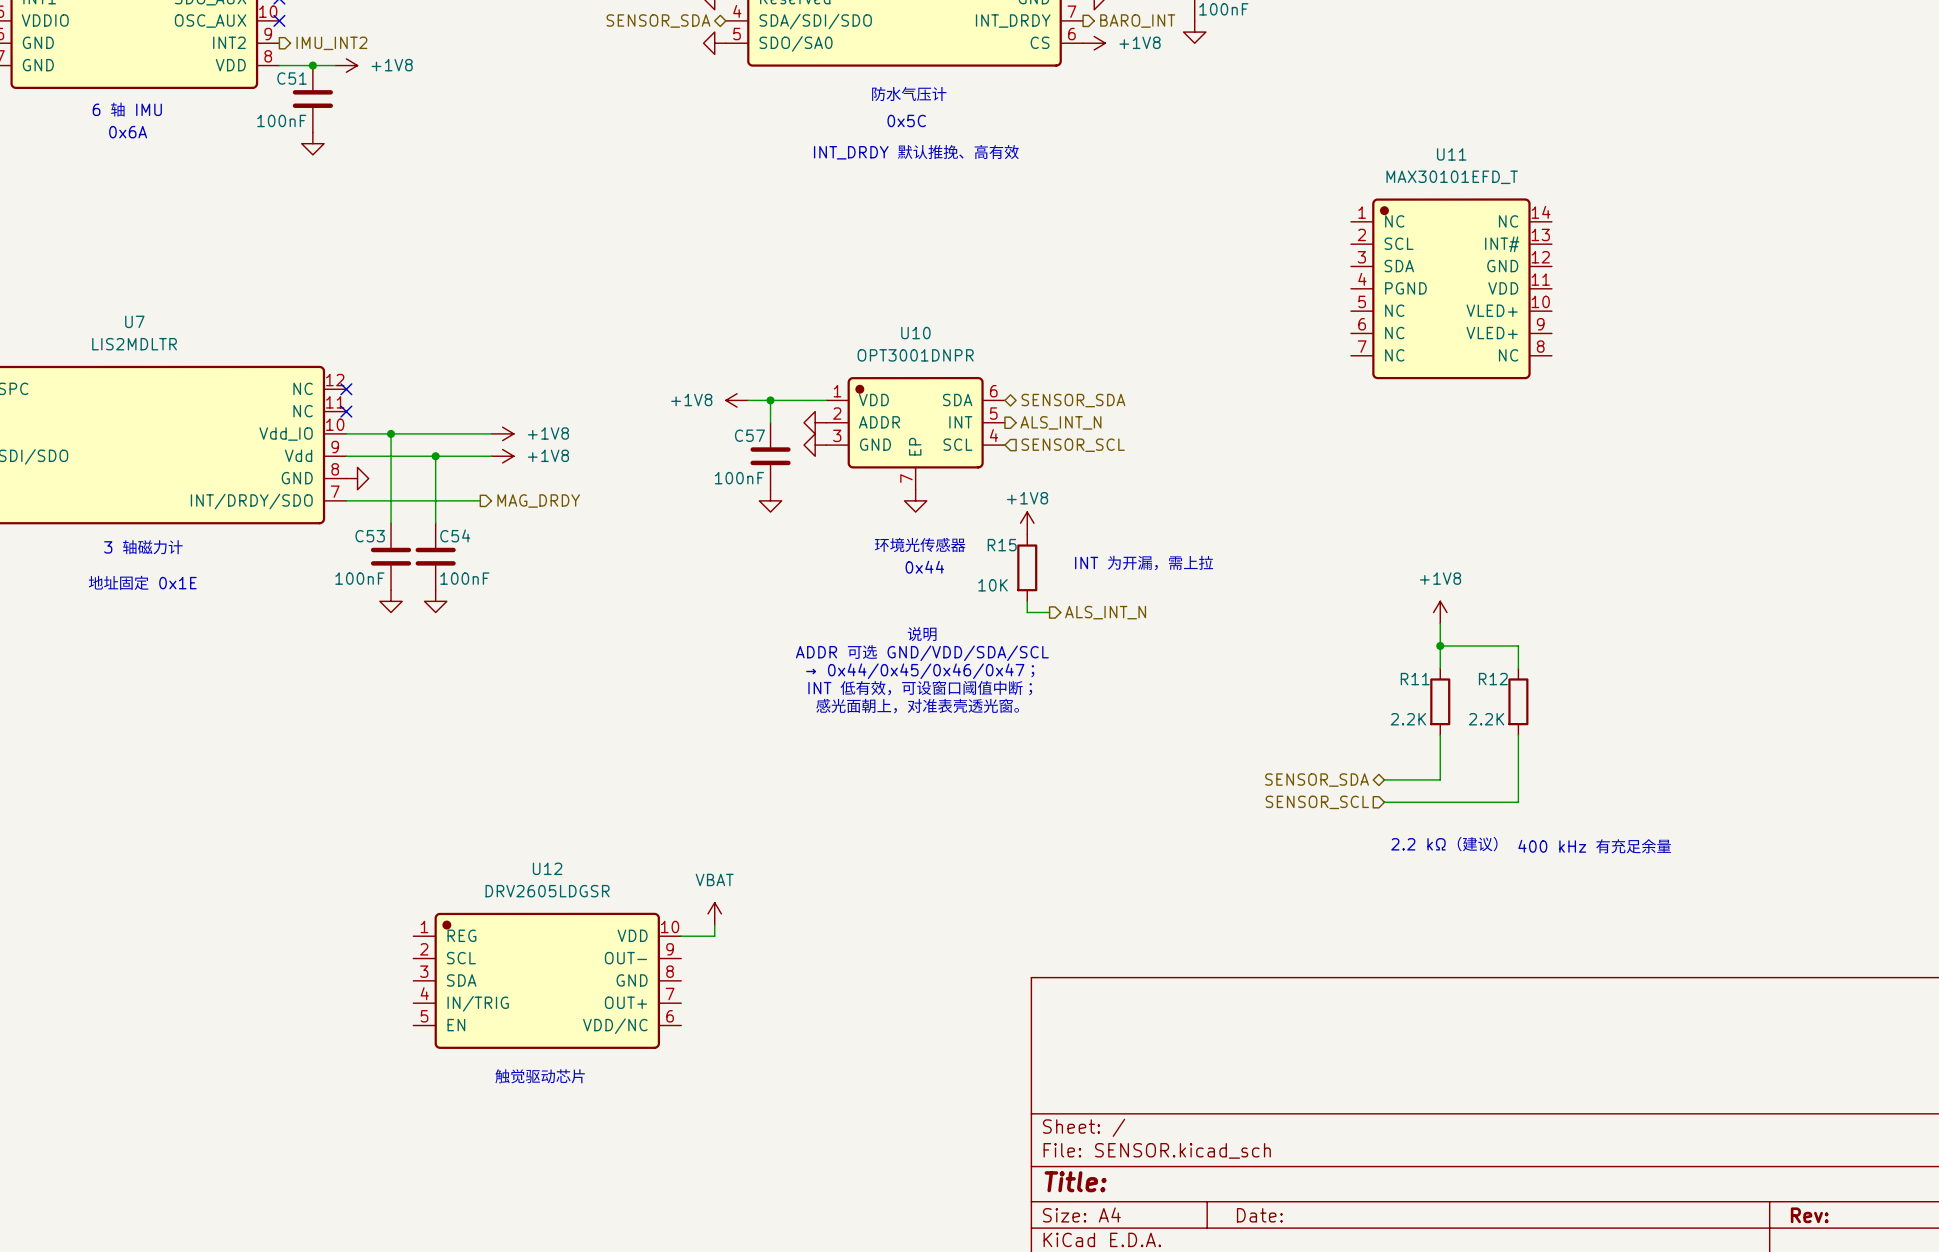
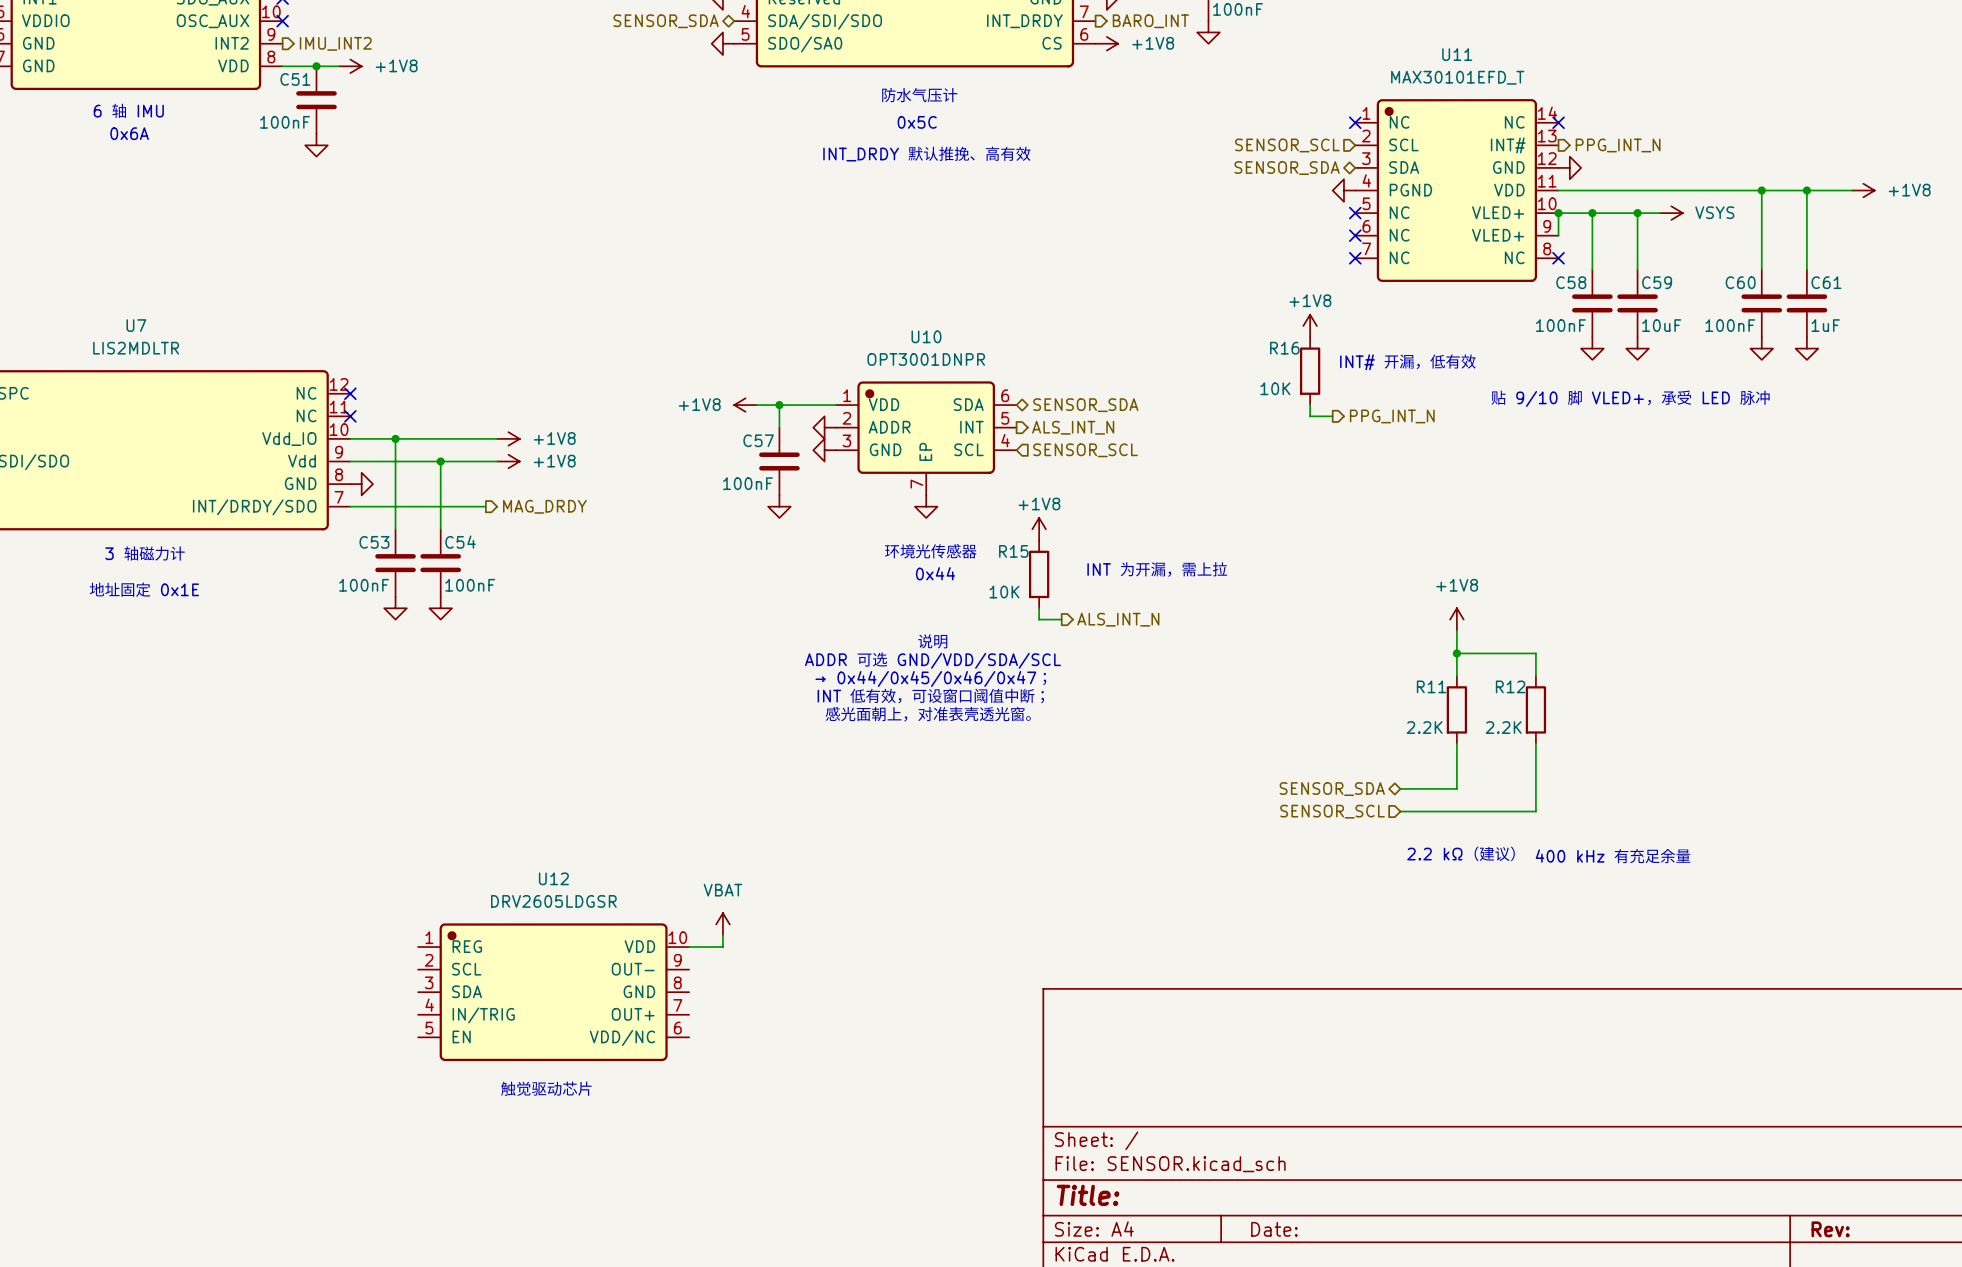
no-connect mark: none -> (1355, 122)
no-connect mark: none -> (1558, 122)
hierarchical label: none -> SENSOR_SCL (1287, 145)
hierarchical label: none -> PPG_INT_N (1618, 145)
hierarchical label: none -> SENSOR_SDA (1287, 168)
power symbol: none -> (1569, 167)
power symbol: none -> (1343, 190)
wire: none -> (1558, 190) (1852, 190)
wire: none -> (1761, 190) (1761, 269)
junction: none -> (1761, 190)
wire: none -> (1806, 190) (1806, 269)
junction: none -> (1806, 190)
power symbol: none -> +1V8 (1863, 190)
no-connect mark: none -> (1355, 213)
junction: none -> (1558, 213)
wire: none -> (1592, 213) (1592, 269)
junction: none -> (1592, 213)
wire: none -> (1637, 213) (1637, 269)
junction: none -> (1637, 213)
wire: none -> (1660, 213) (1558, 213) (1558, 235)
power symbol: none -> VSYS (1671, 213)
no-connect mark: none -> (1355, 235)
no-connect mark: none -> (1355, 258)
no-connect mark: none -> (1558, 258)
U11 position: (1451, 288) -> (1456, 190)
C58: none -> 100nF (1592, 303)
C59: none -> 10uF (1637, 303)
C60: none -> 100nF (1761, 303)
C61: none -> 1uF (1806, 303)
power symbol: none -> +1V8 (1310, 326)
power symbol: none -> (1592, 348)
power symbol: none -> (1637, 348)
power symbol: none -> (1761, 348)
power symbol: none -> (1806, 348)
text: none -> INT# 开漏，低有效 (1408, 362)
R16: none -> 10K (1310, 371)
text: none -> 贴 9/10 脚 VLED+，承受 LED 脉冲 (1630, 398)
wire: none -> (1310, 405) (1310, 416) (1332, 416)
hierarchical label: none -> PPG_INT_N (1392, 416)

